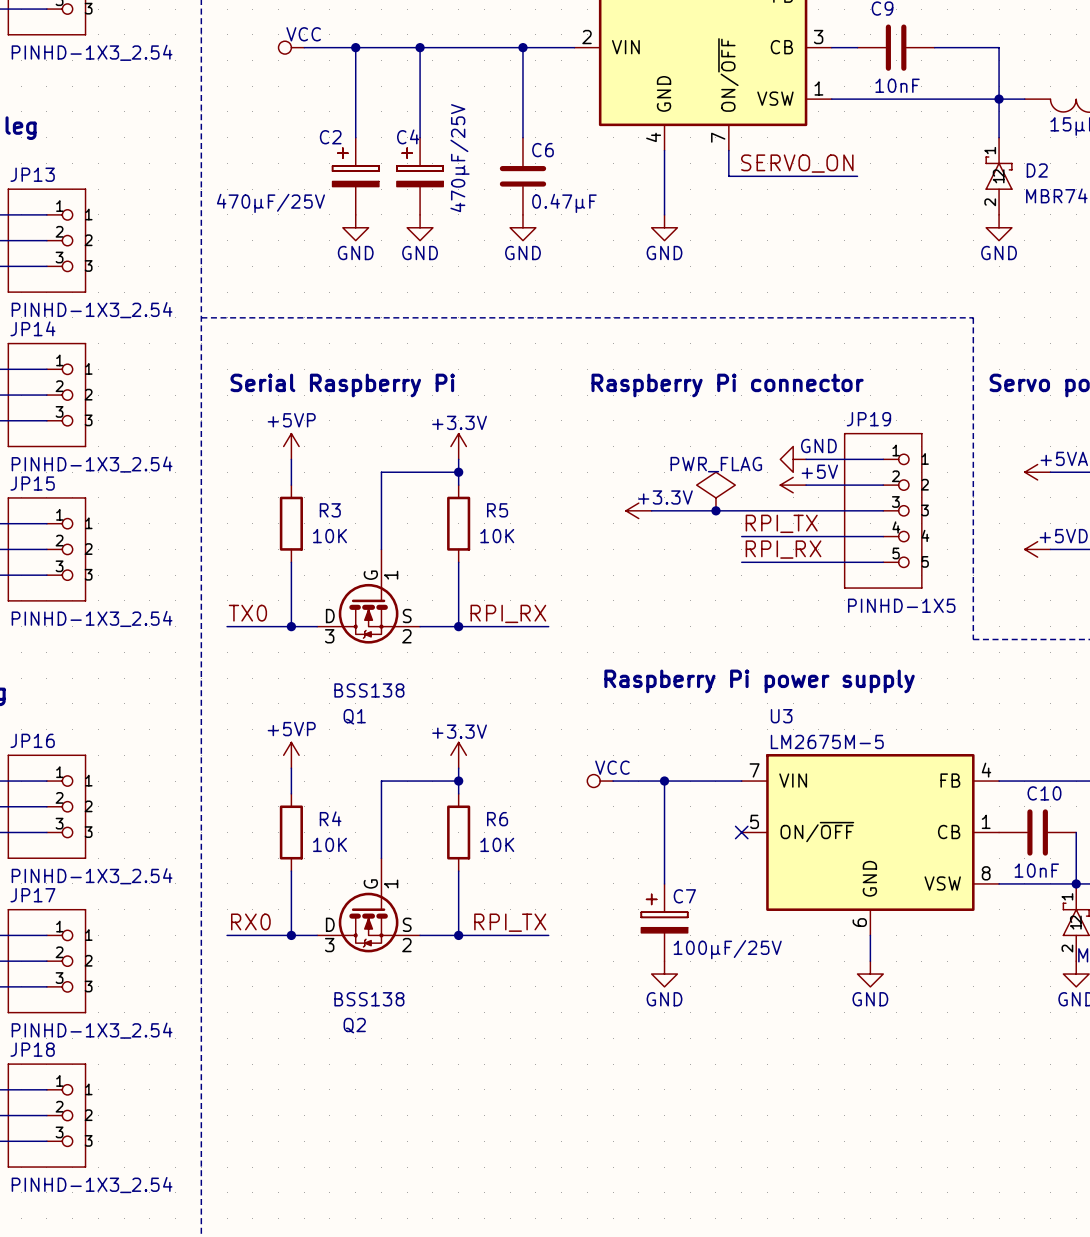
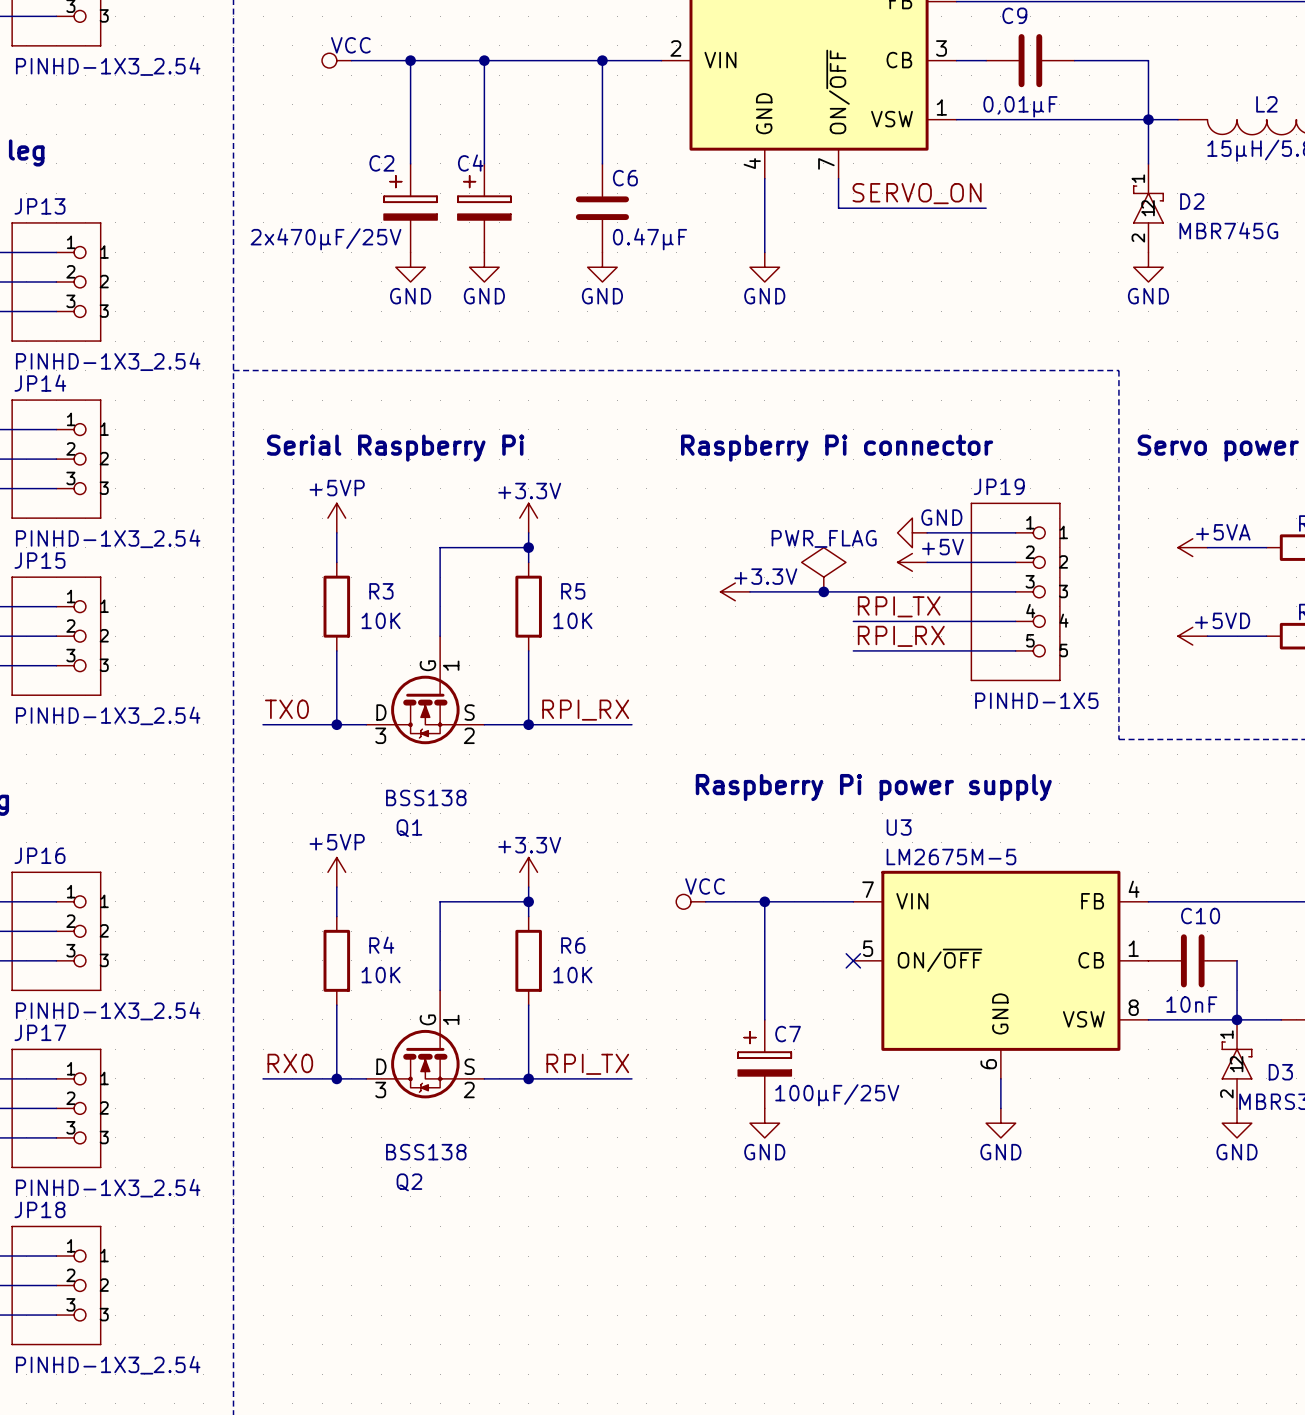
C9 value: 10nF (897, 85) -> 0,01µF (1020, 106)
C4 value: 470µF/25V (460, 158) -> none
C2 value: 470µF/25V (270, 203) -> 2x470µF/25V (326, 239)

